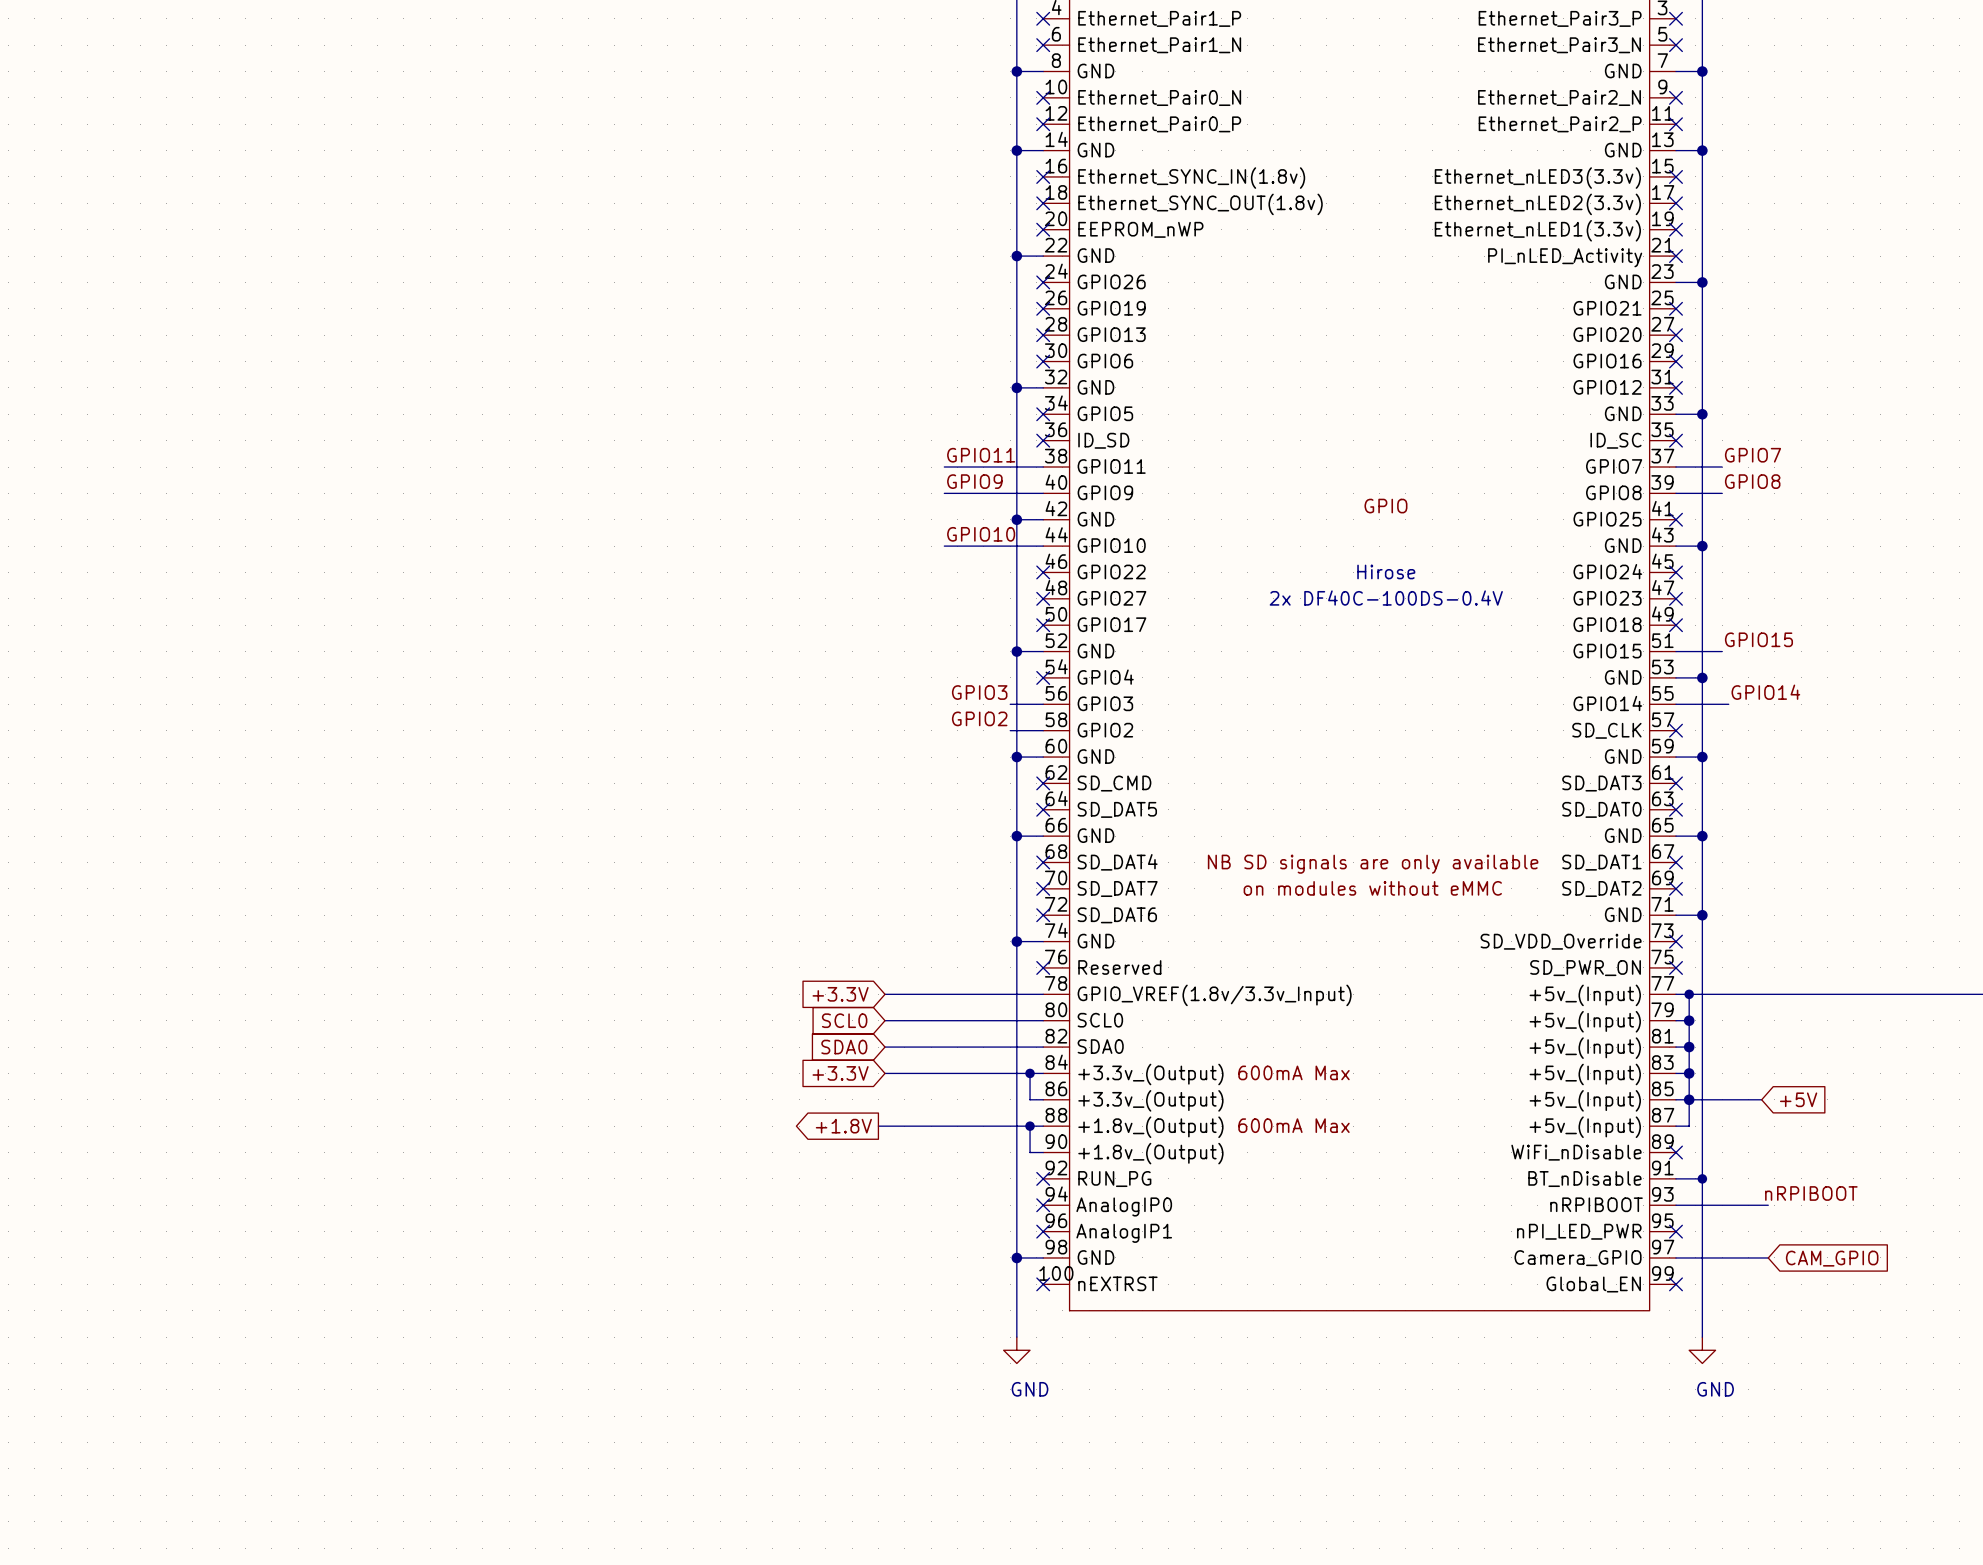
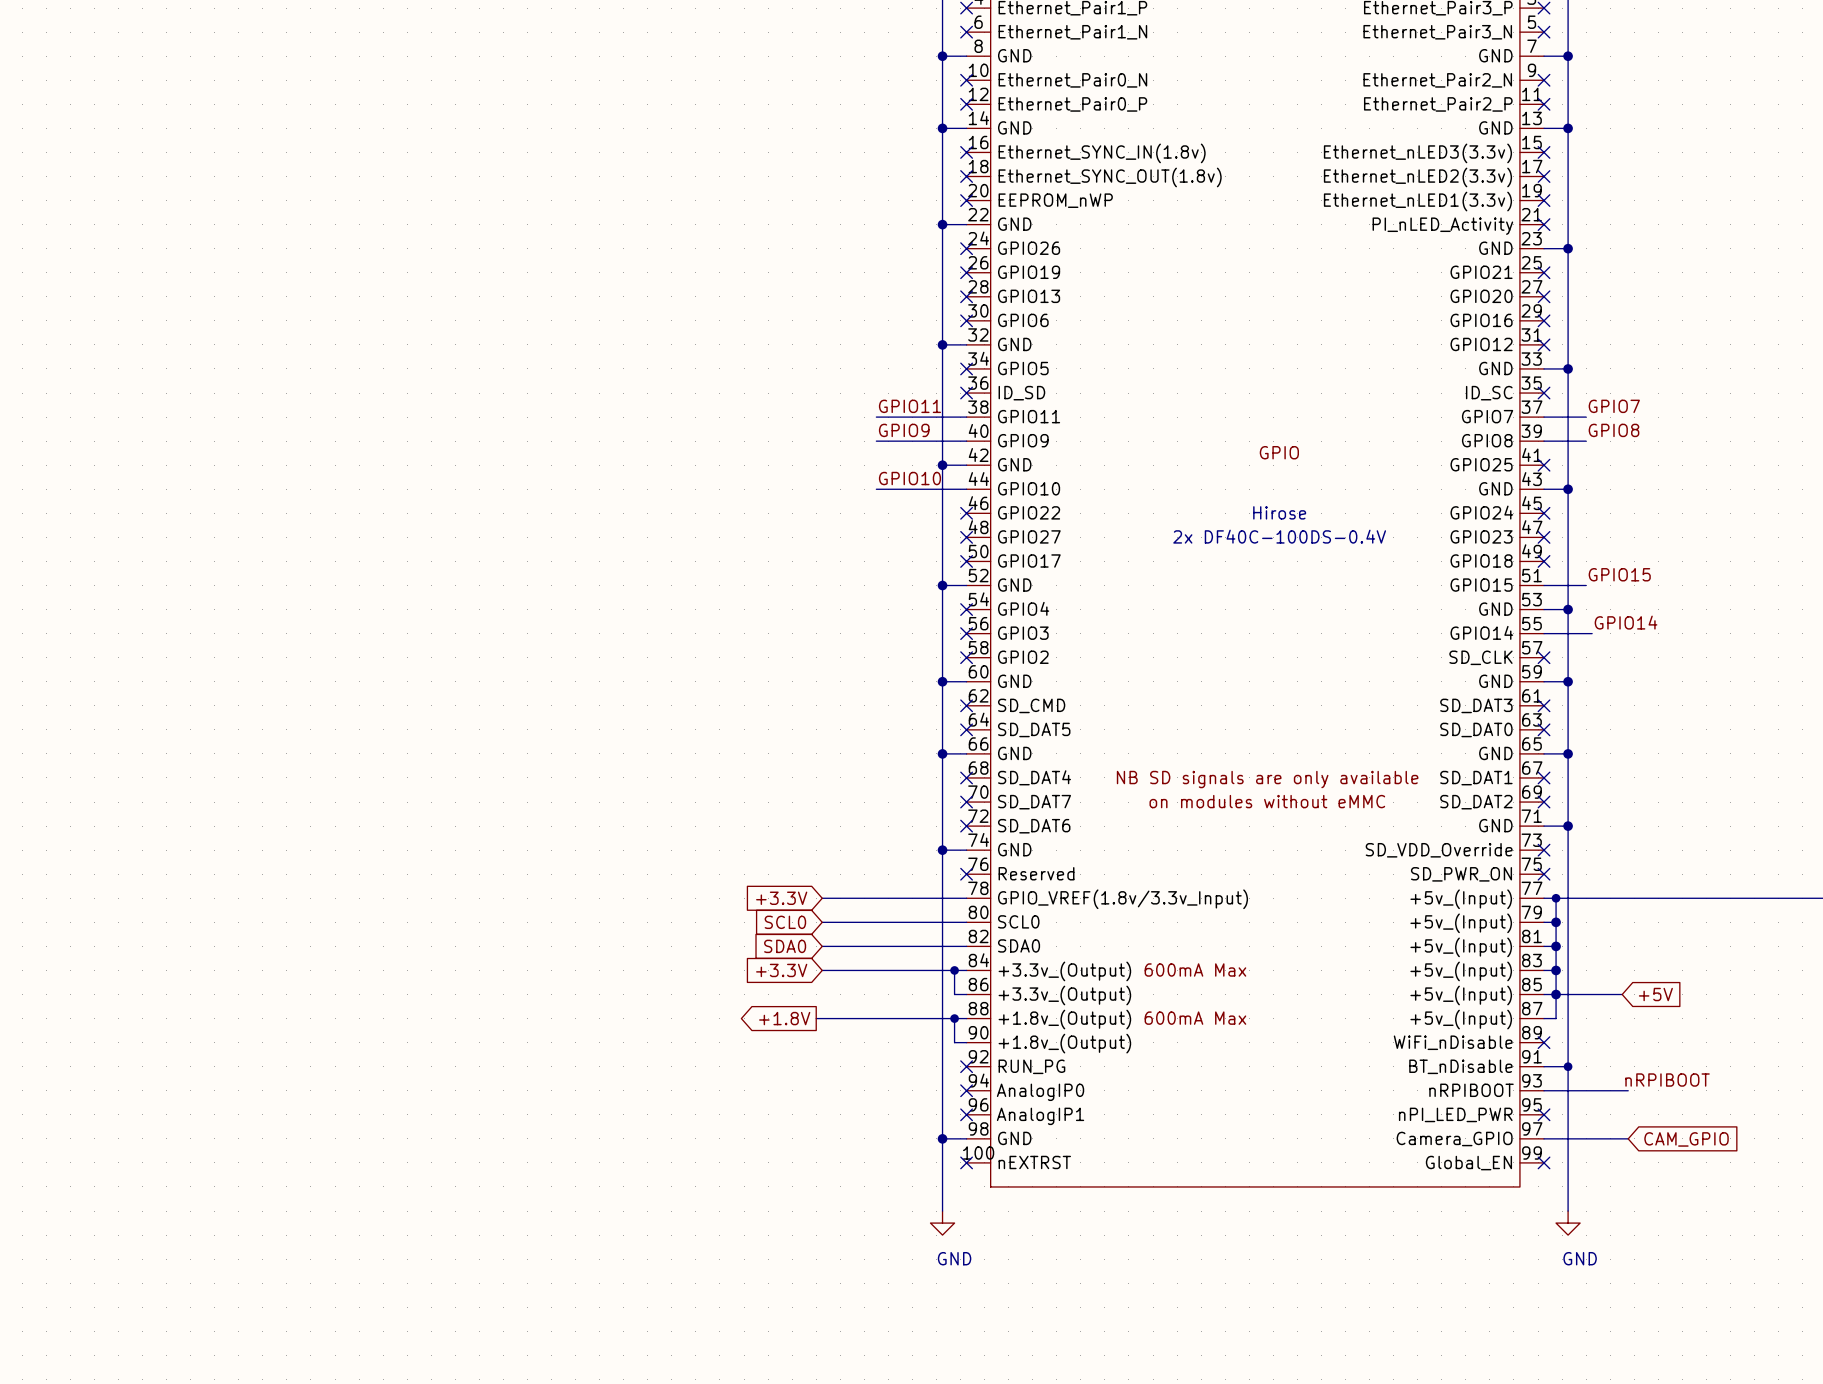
label: GPIO3 (979, 692) -> none
wire: (1010, 704) (1043, 704) -> none
no-connect mark: none -> (966, 633)
label: GPIO2 (979, 718) -> none
wire: (1010, 730) (1043, 730) -> none
no-connect mark: none -> (966, 657)

